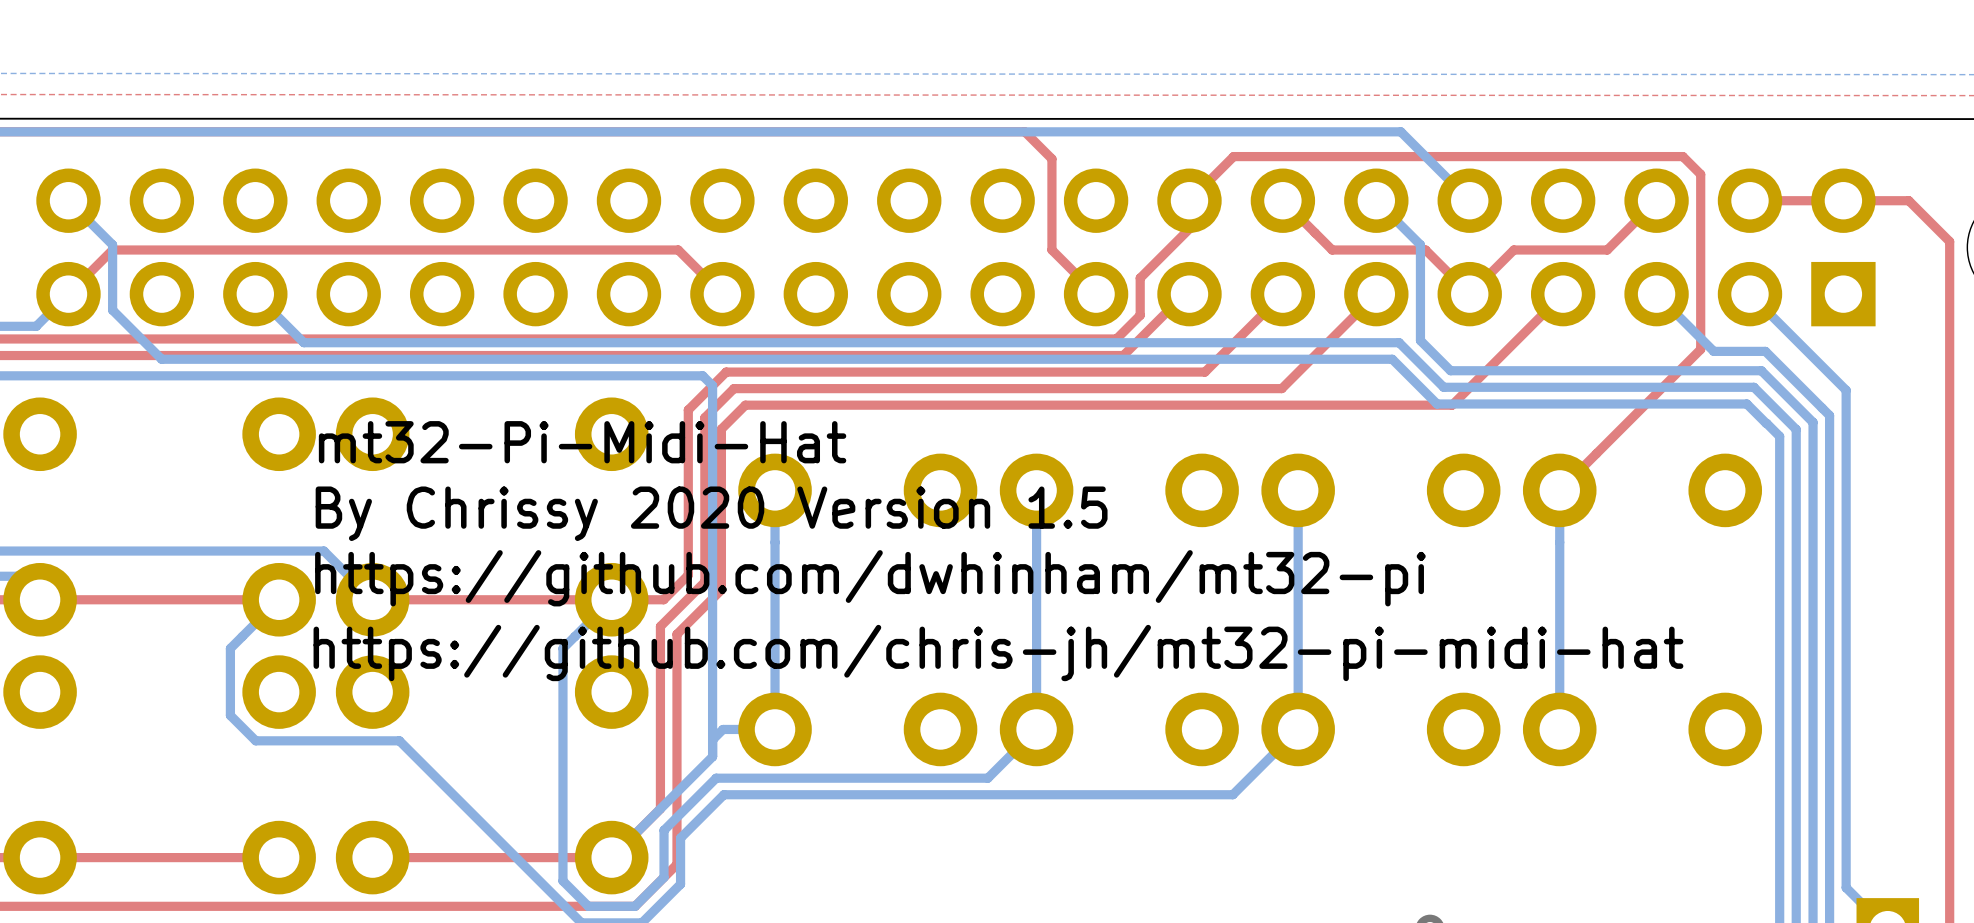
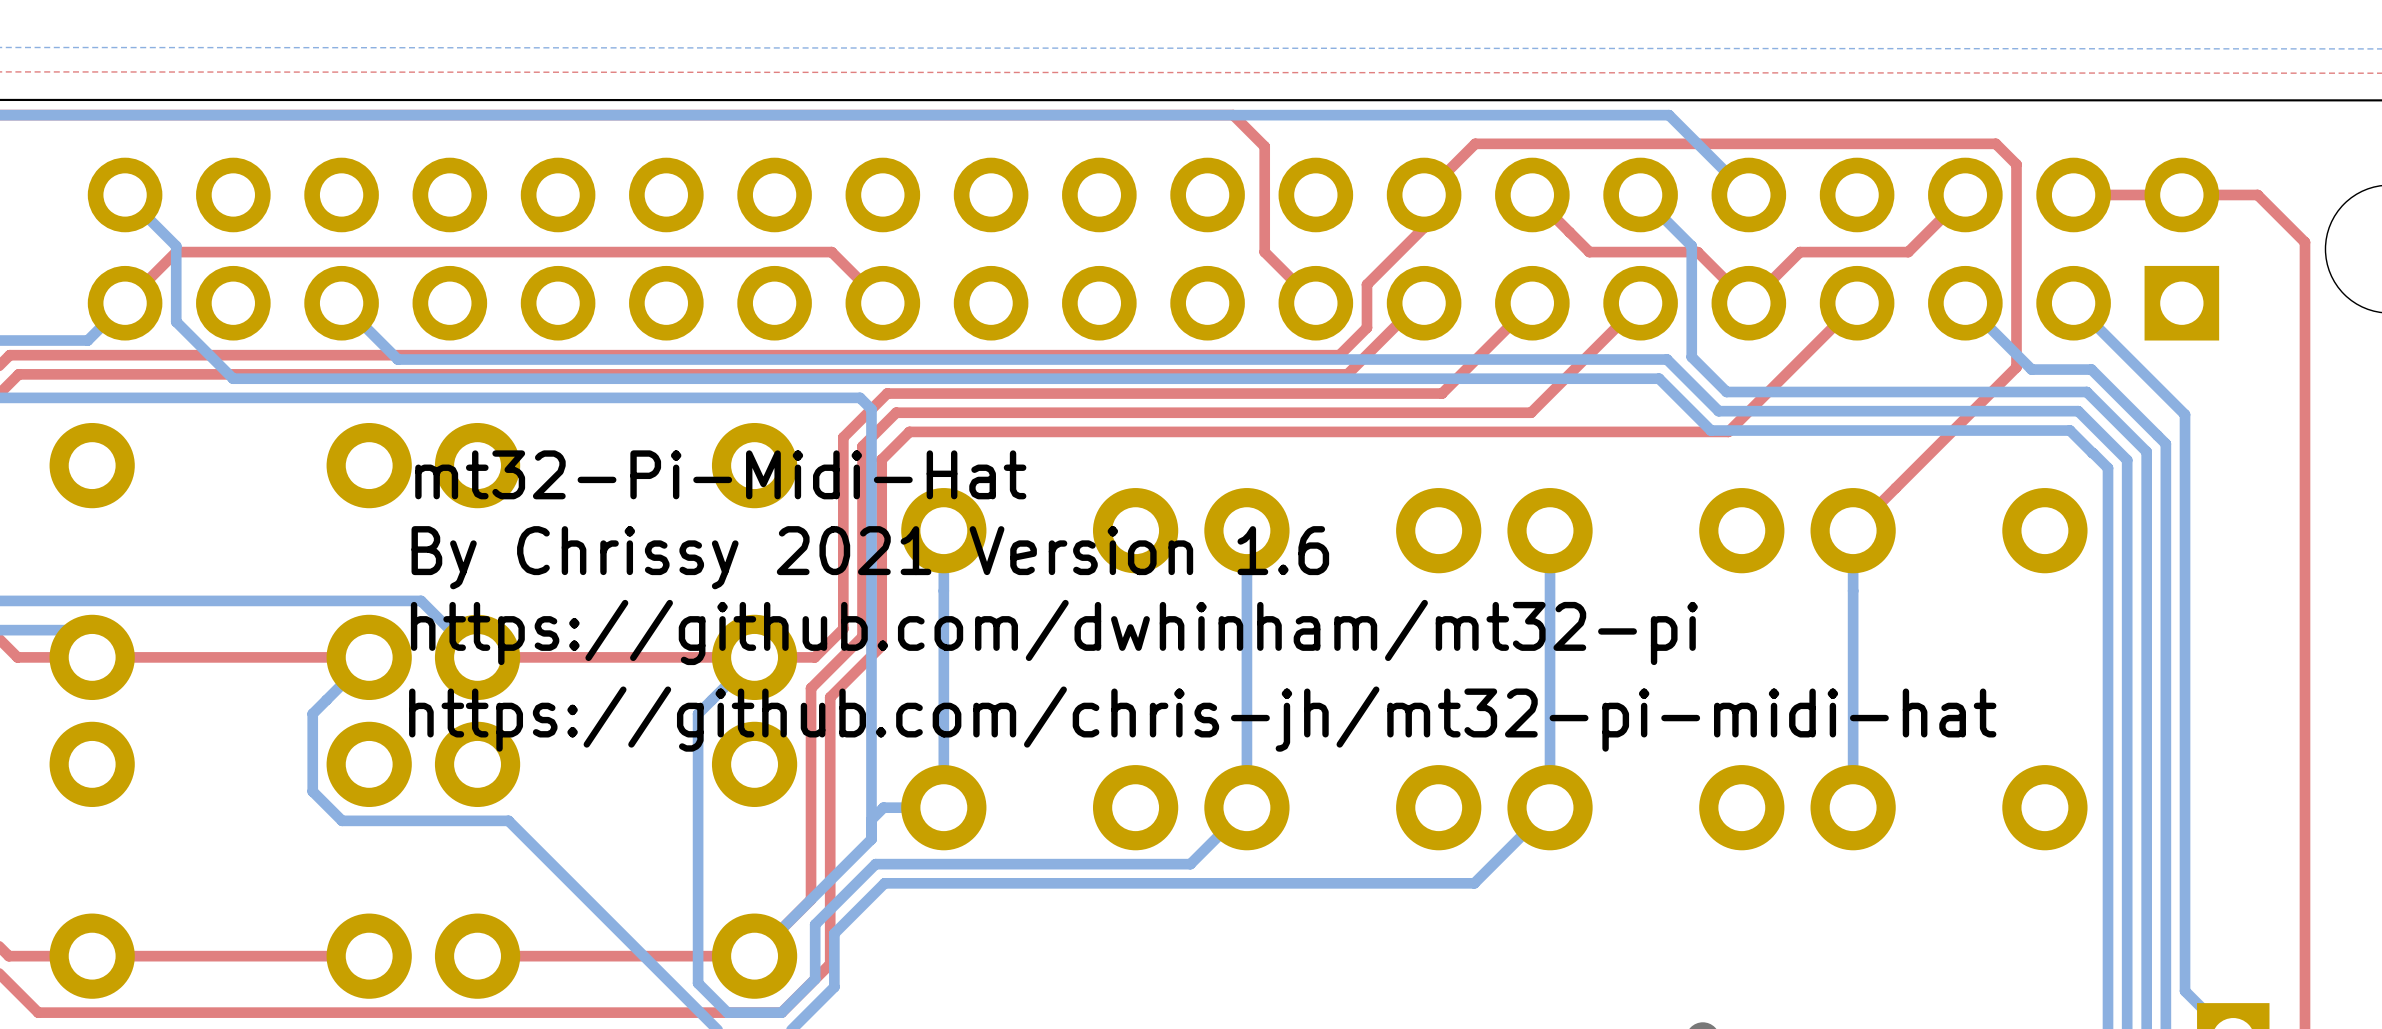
text: By Chrissy 2020 Version 1.5 (711, 513) -> By Chrissy 2021 Version 1.6 (870, 557)

